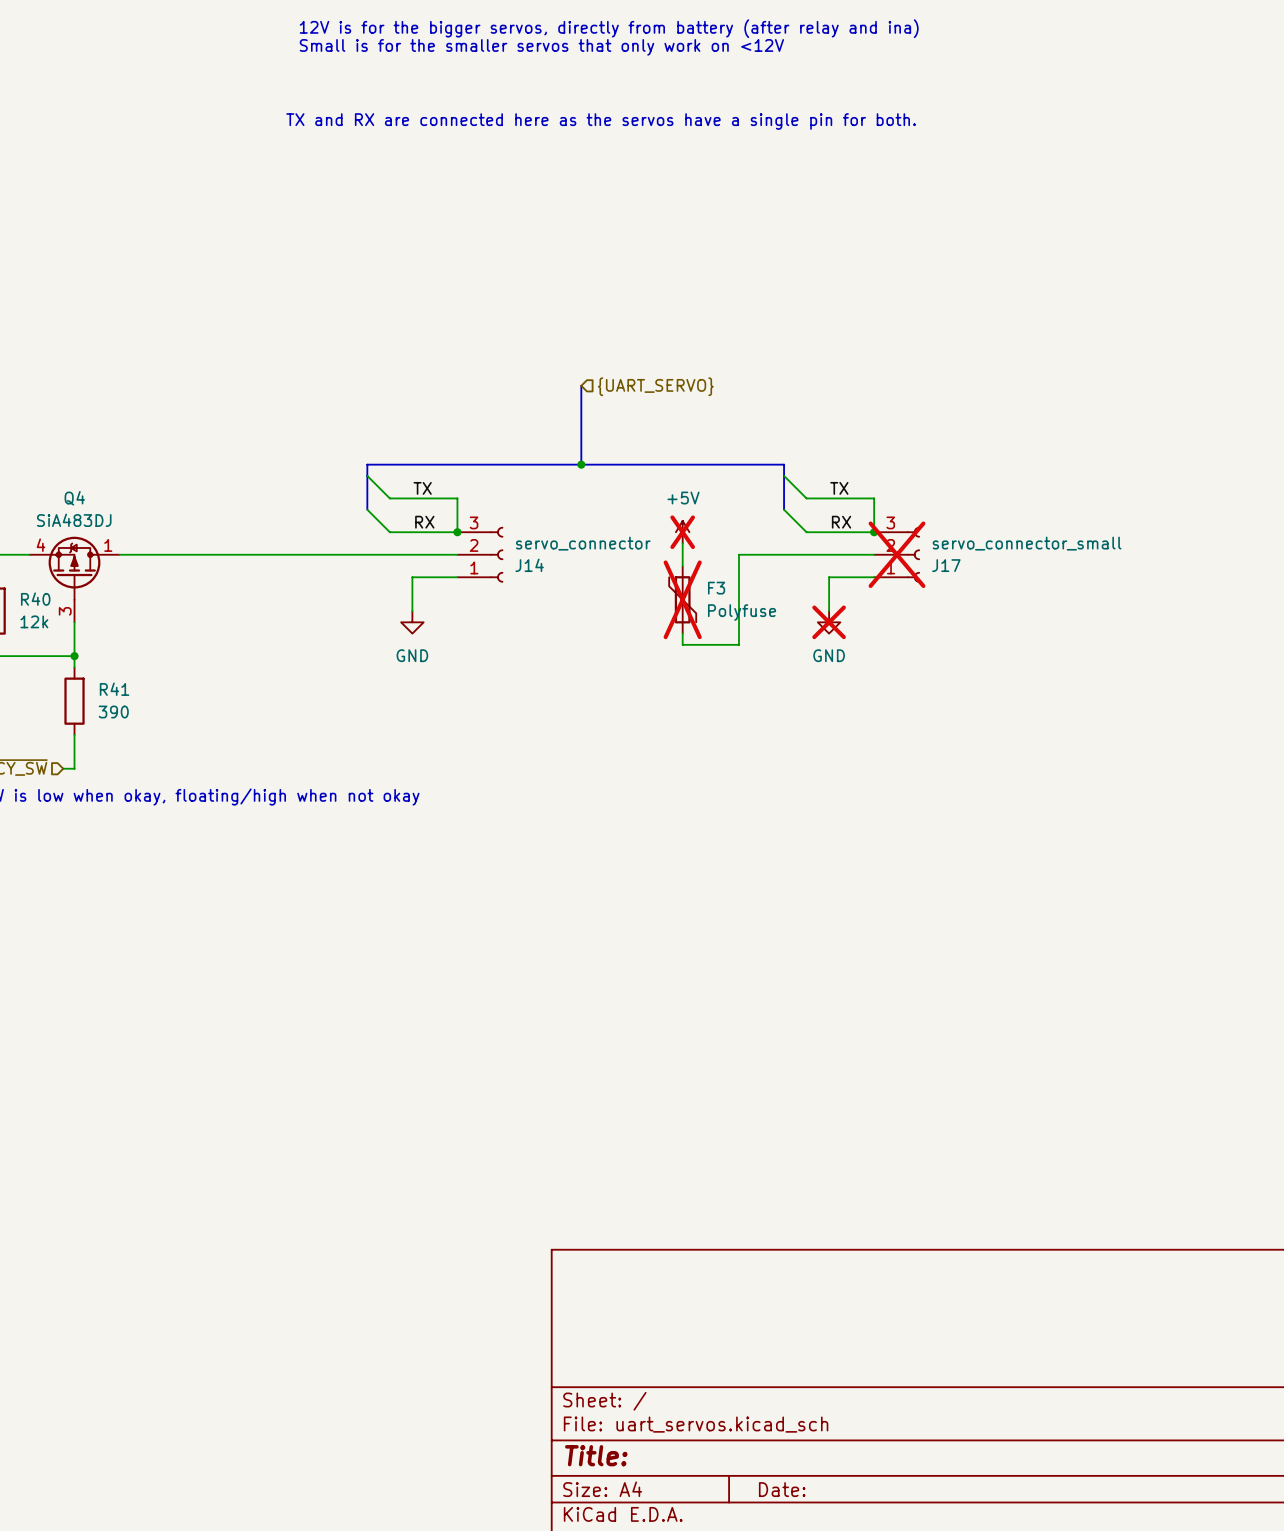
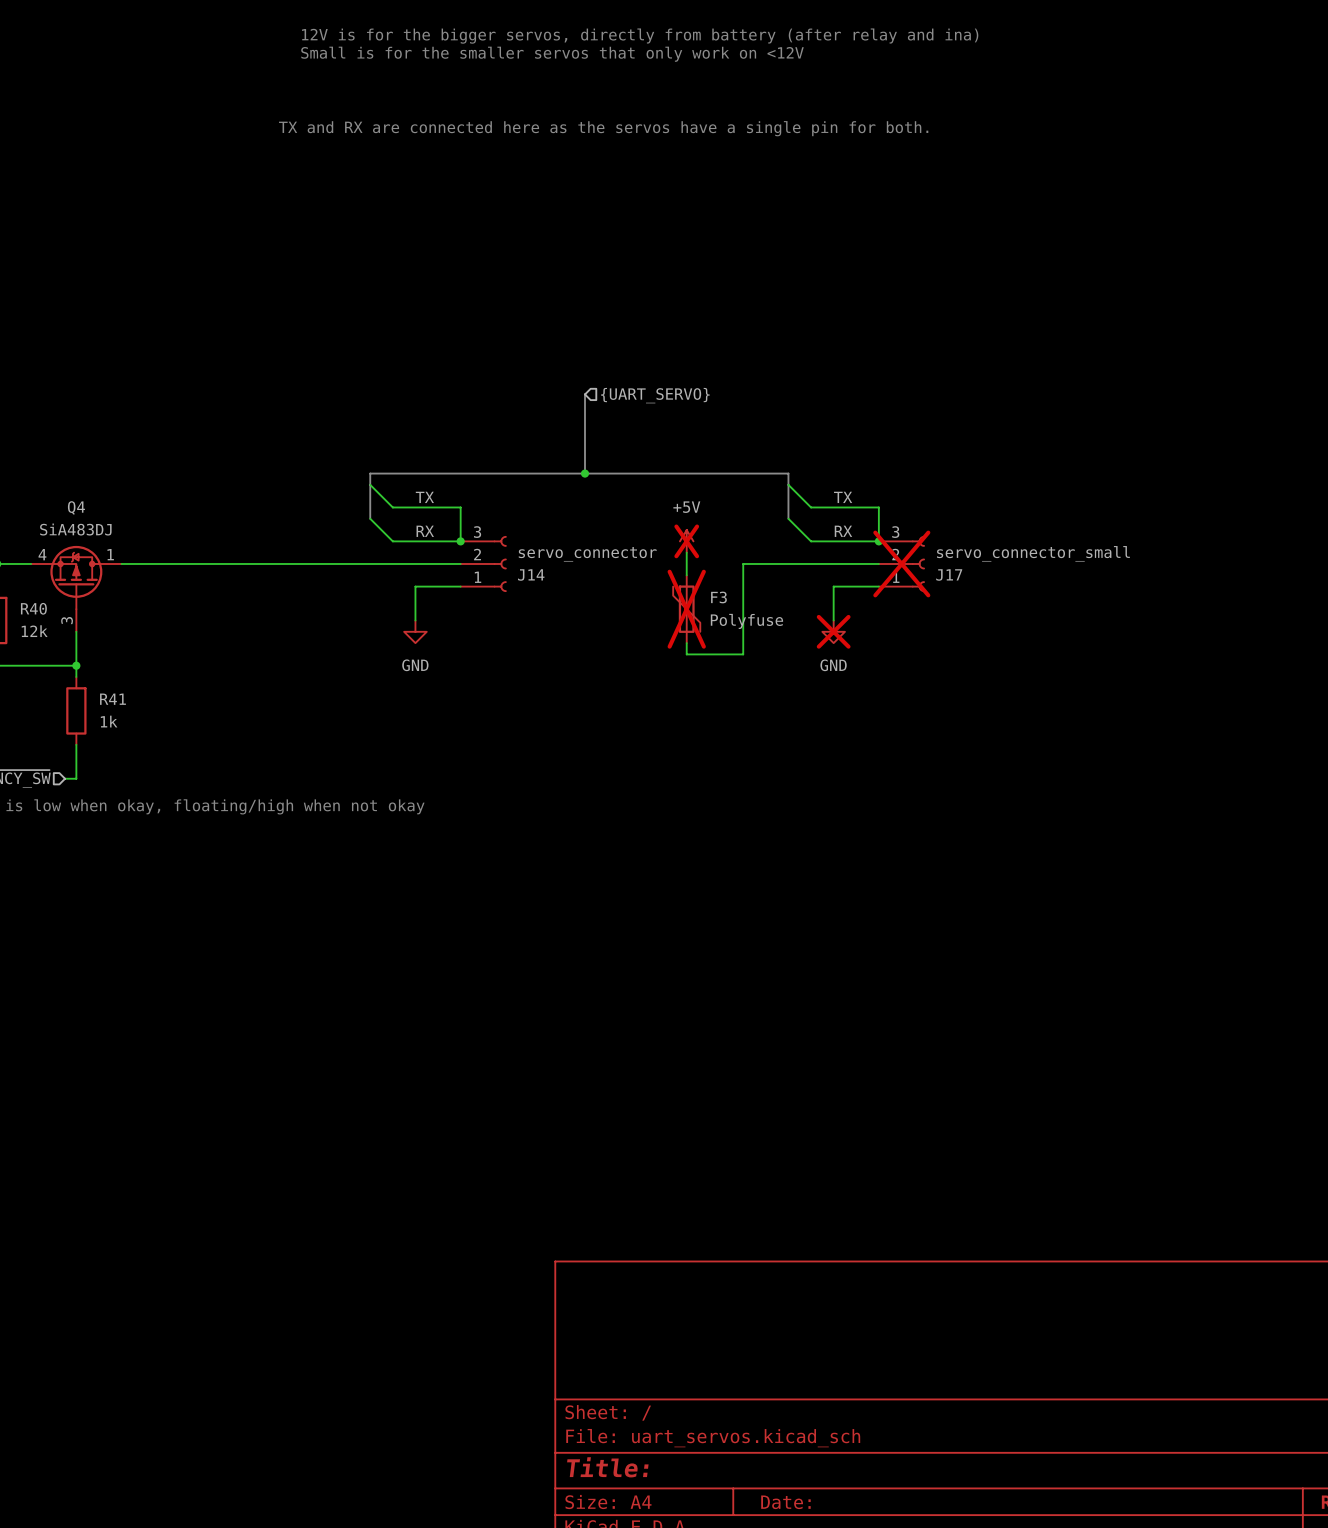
R41 value: 390 (113, 712) -> 1k (109, 721)

